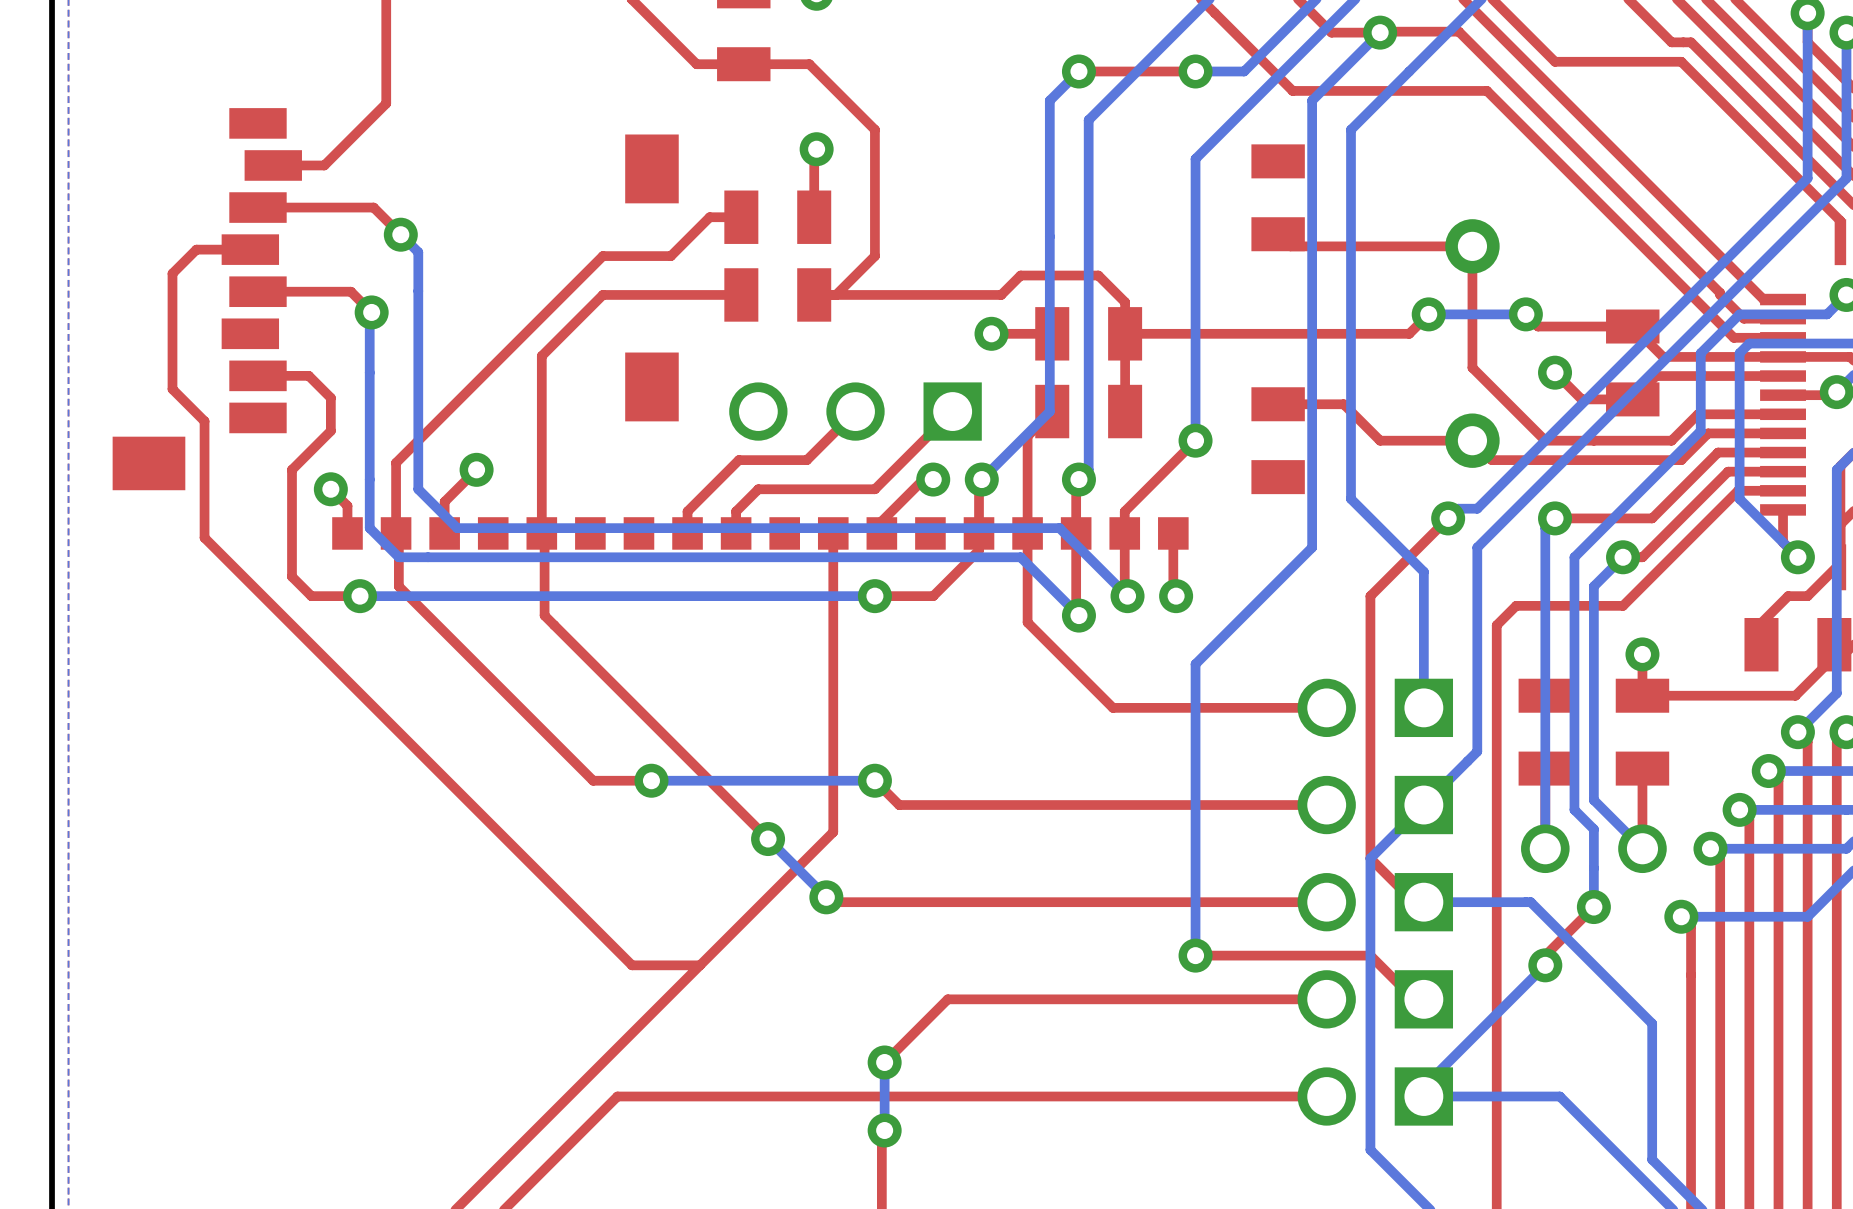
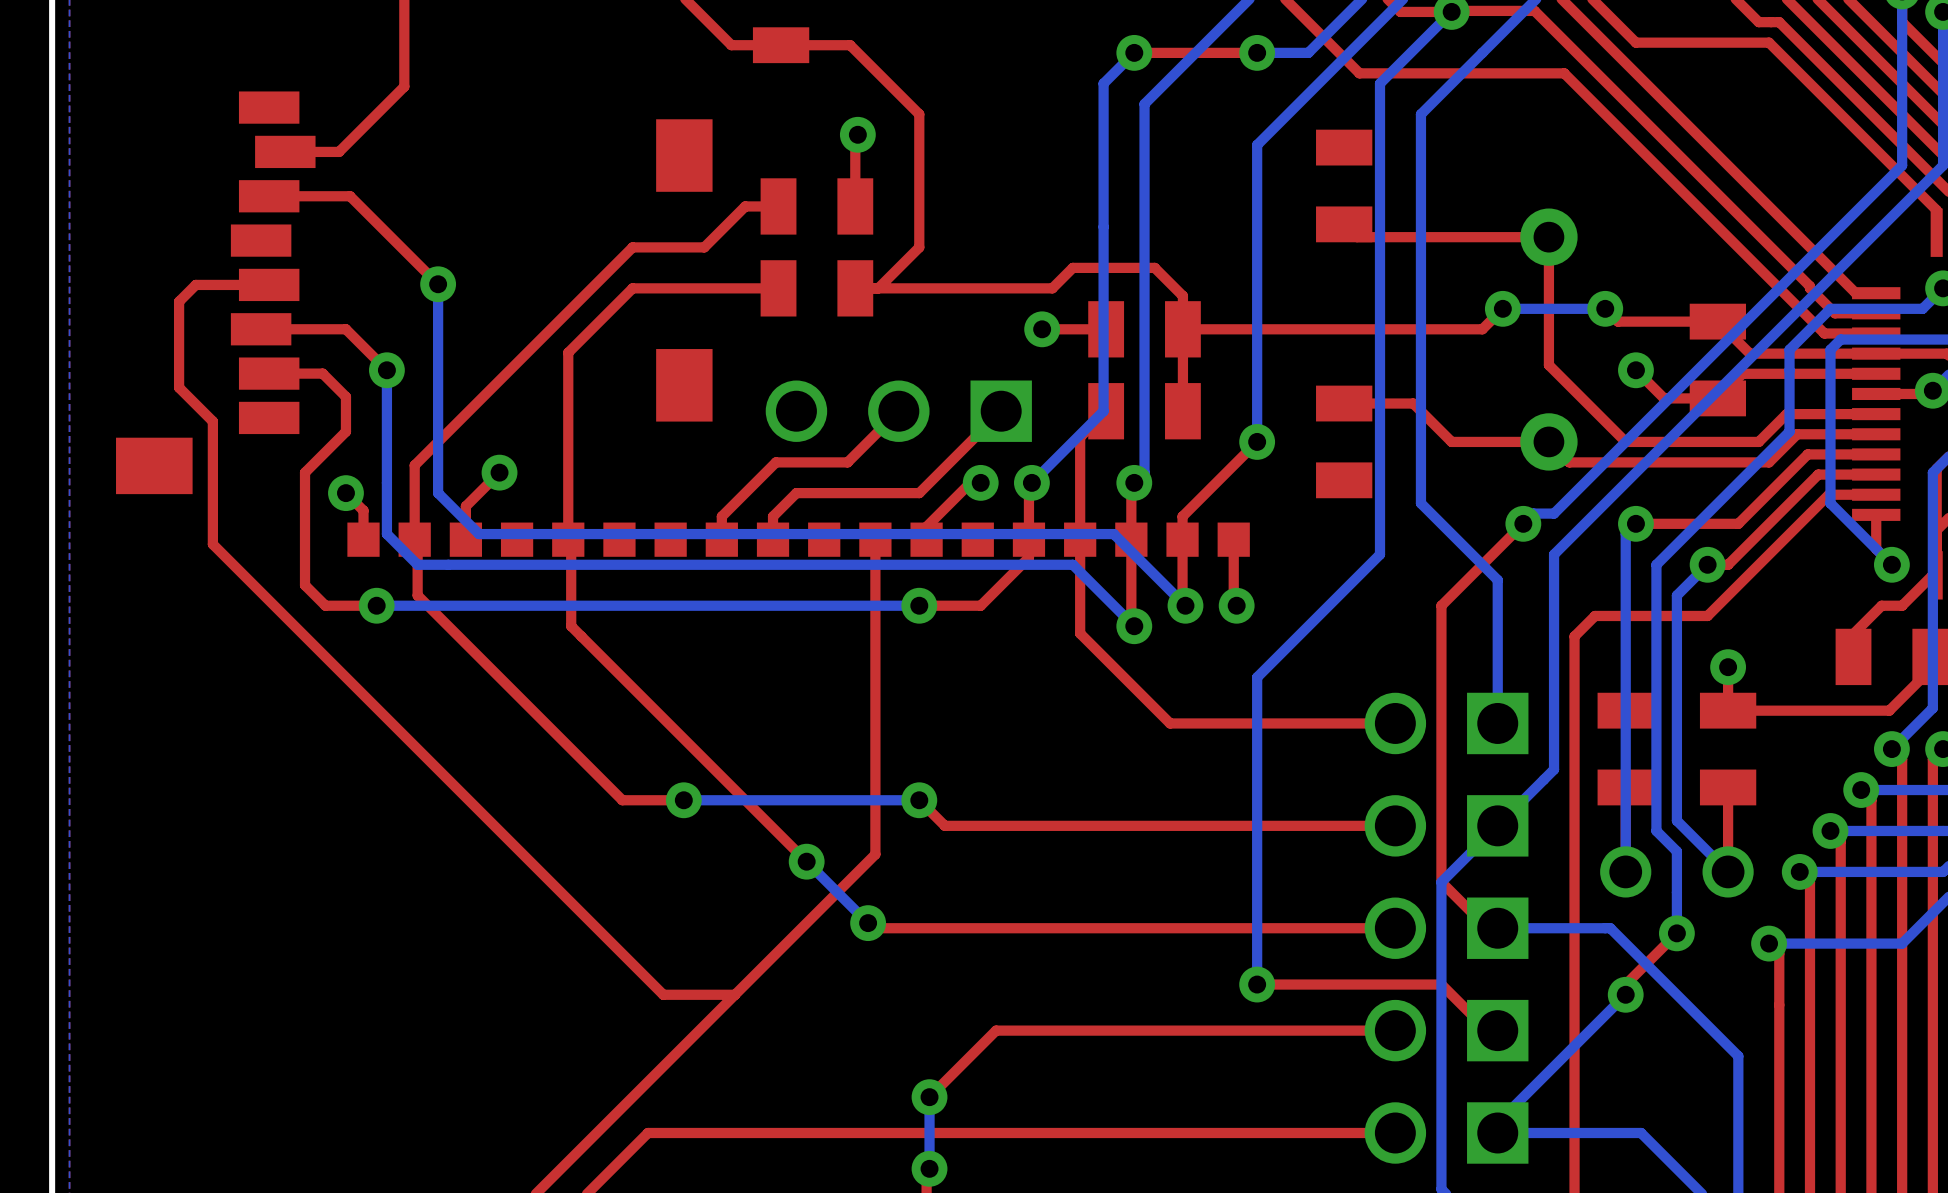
top track: (334, 207) (373, 207) (400, 234) -> (350, 196) (438, 284)
bottom track: (400, 234) (418, 252) (418, 291) -> none
via: (400, 234) -> none
top track: (250, 249) (196, 249) (172, 273) (172, 307) -> (269, 284) (195, 284) (179, 301)
top track: (257, 291) (350, 291) (371, 312) -> none
via: none -> (438, 284)
bottom track: (371, 312) (369, 314) (369, 372) -> none
via: (371, 312) -> none
top track: none -> (261, 329) (345, 329) (386, 370)
via: none -> (386, 370)

